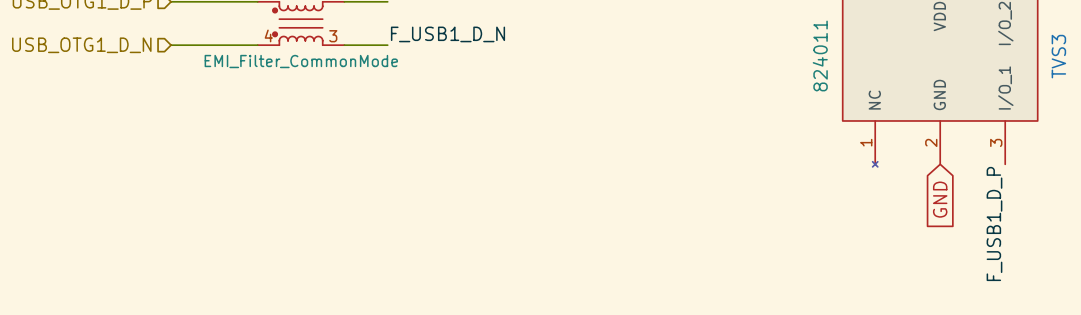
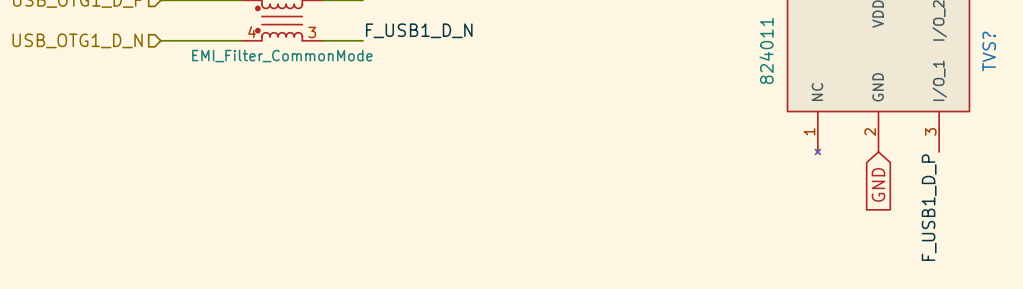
TVS3 name: TVS3 (1058, 56) -> TVS? (989, 51)

